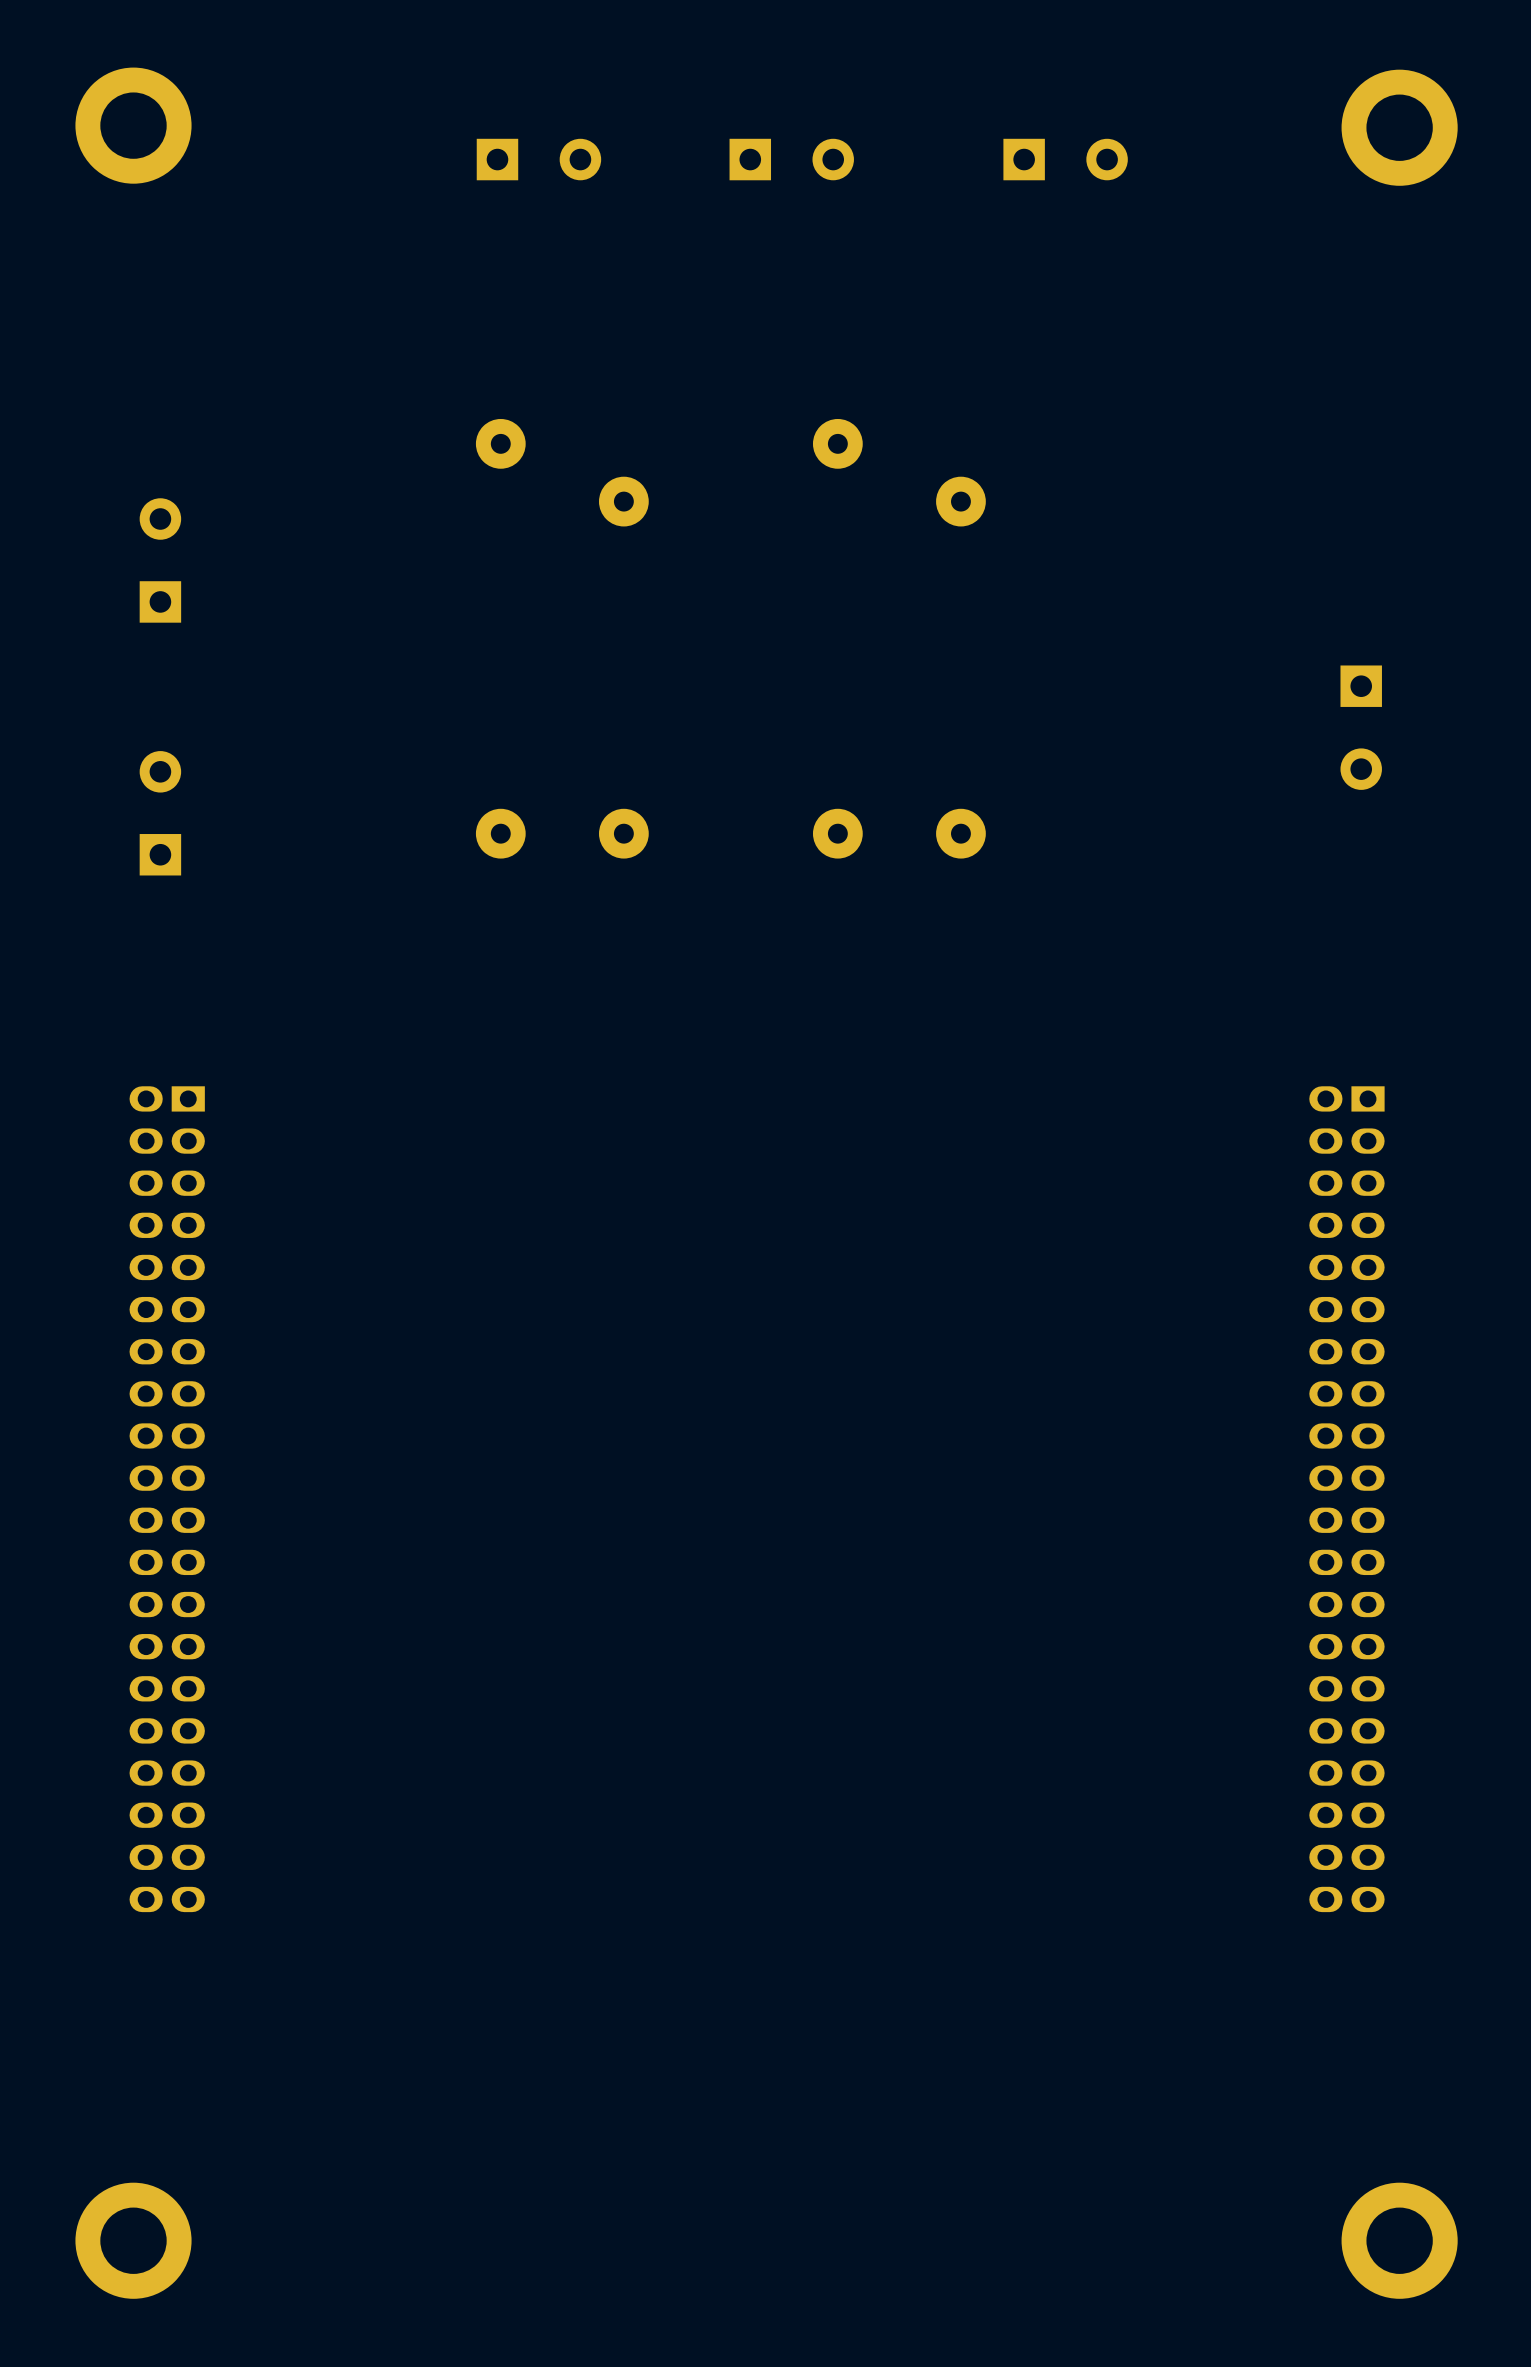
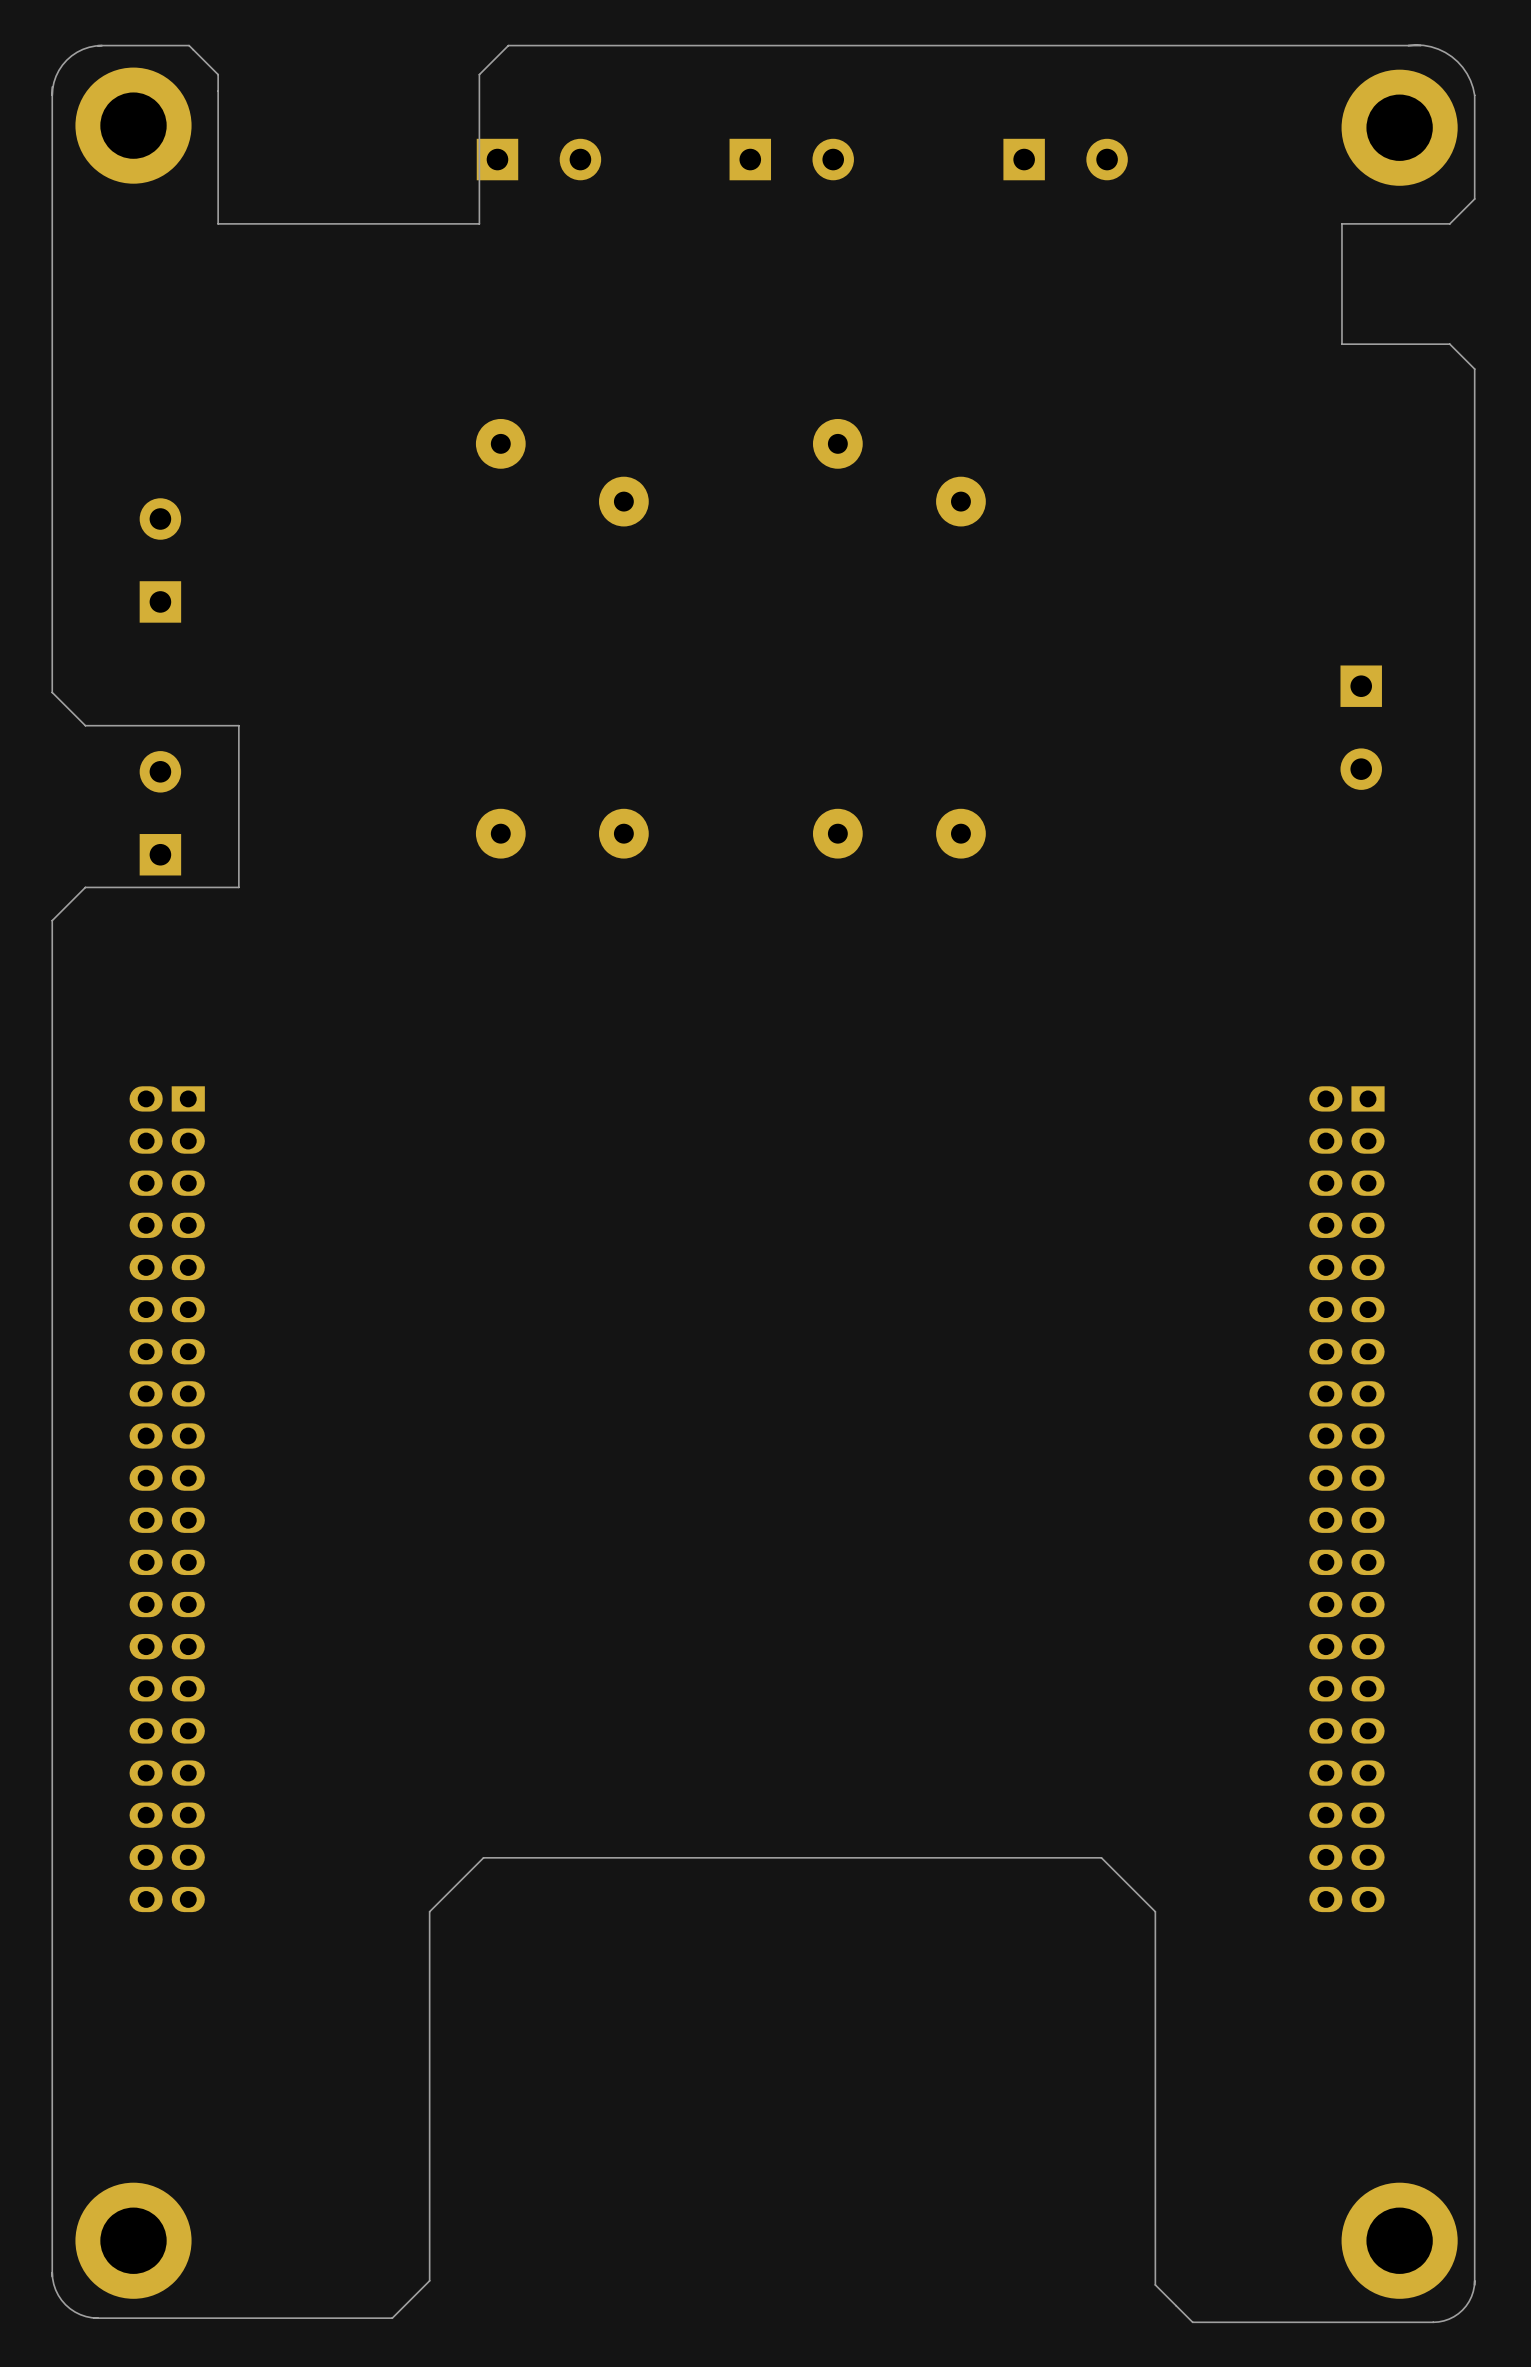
board edge: none -> (102, 45) (82, 49) (66, 60) (56, 76) (52, 95)
board edge: none -> (1408, 45) (1423, 45) (1445, 52) (1462, 67) (1470, 80) (1474, 95) (1474, 199) (1449, 223) (1341, 223) (1341, 344) (1449, 344) (1474, 369) (1474, 2284)
board edge: none -> (1420, 45) (508, 45) (479, 74) (479, 223) (218, 223) (218, 74) (189, 45) (97, 45)
board edge: none -> (52, 87) (52, 692) (85, 725) (238, 725) (238, 887) (85, 887) (52, 920) (52, 2276)
board edge: none -> (52, 2272) (55, 2289) (65, 2304) (80, 2314) (97, 2318)
board edge: none -> (1474, 2280) (1471, 2296) (1462, 2310) (1449, 2319) (1433, 2322) (1192, 2322) (1155, 2284) (1155, 1911) (1101, 1857) (483, 1857) (429, 1911) (429, 2280) (392, 2318) (93, 2318)

